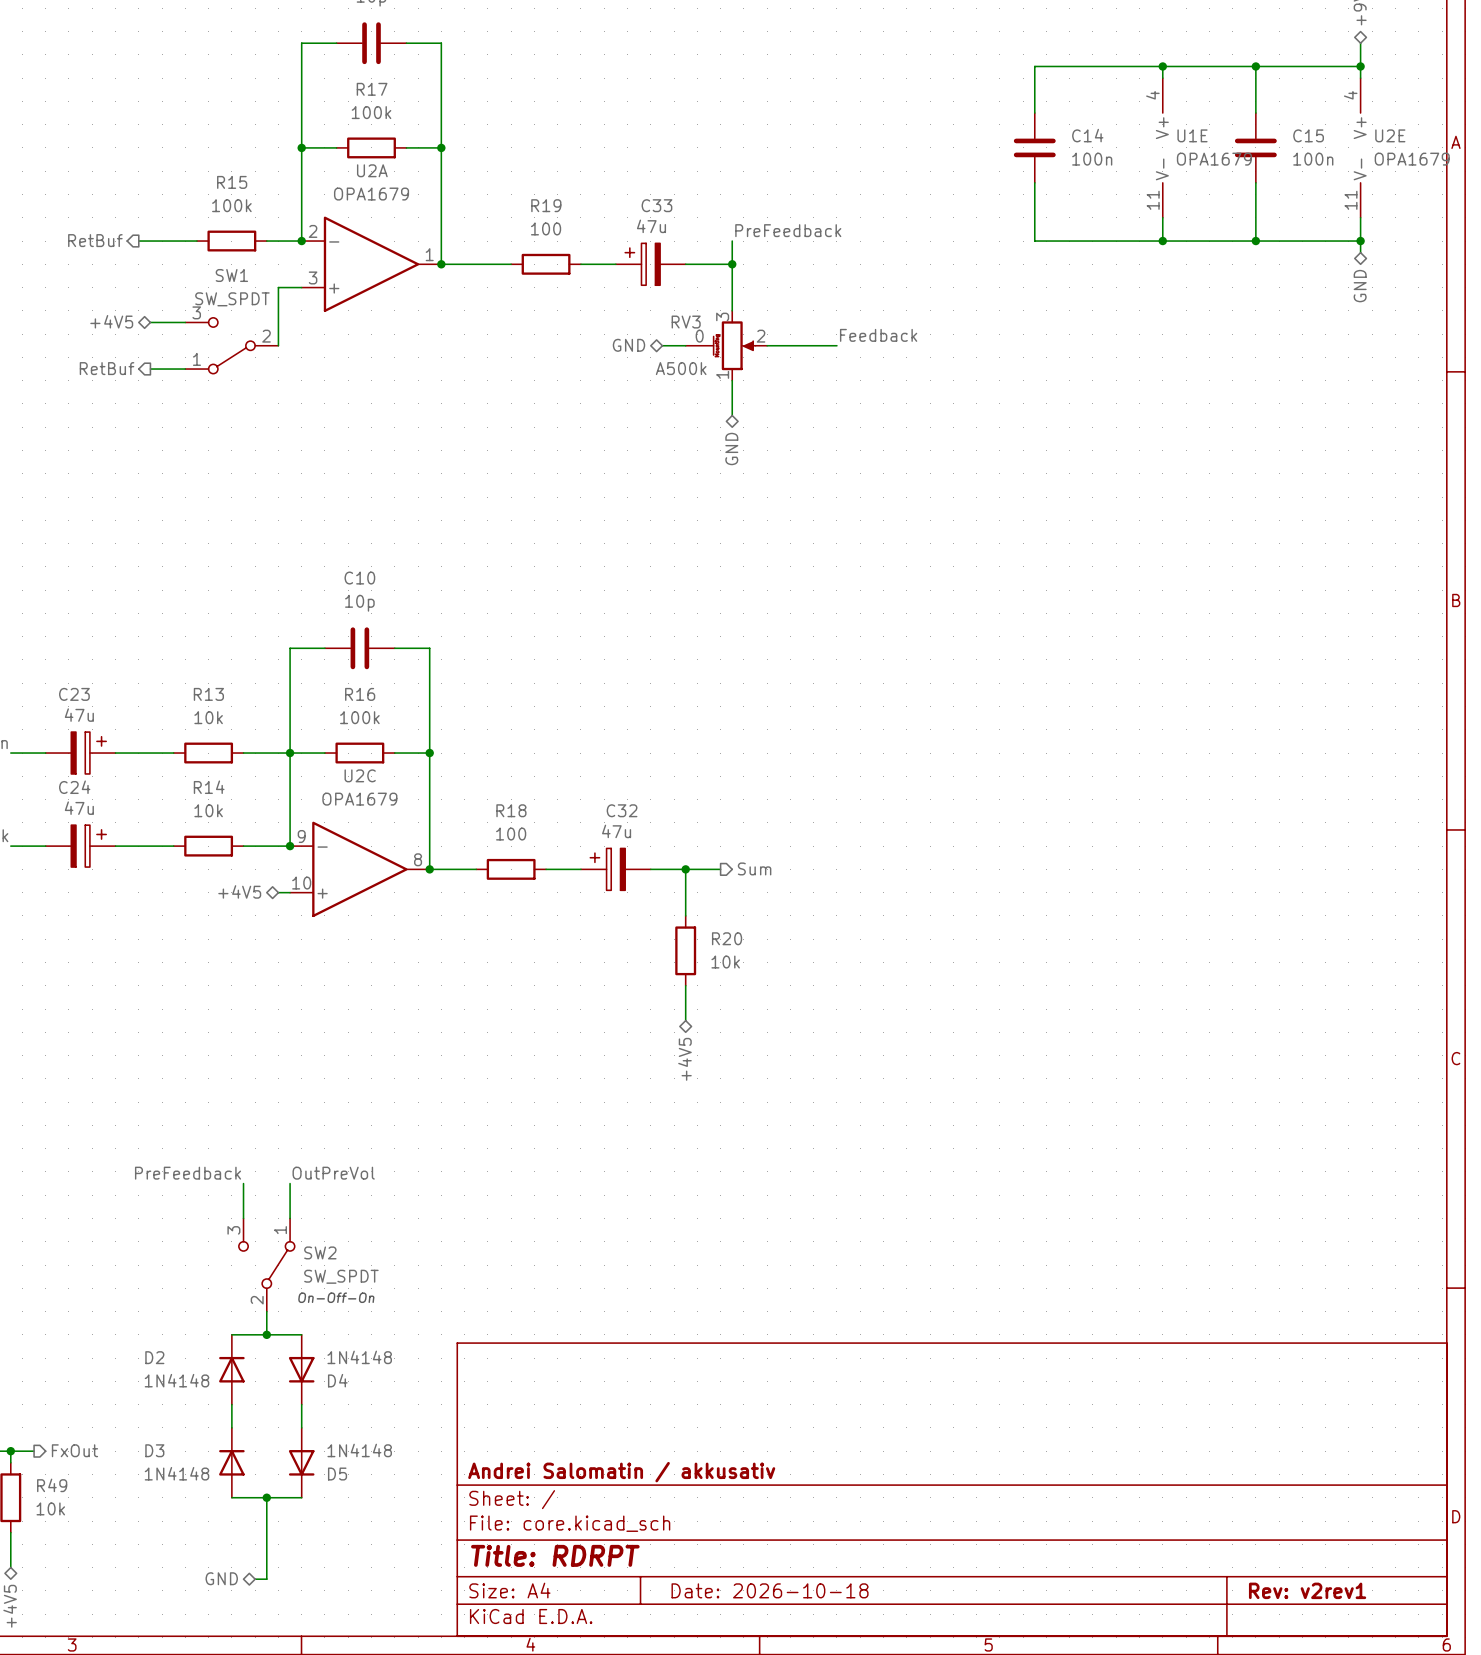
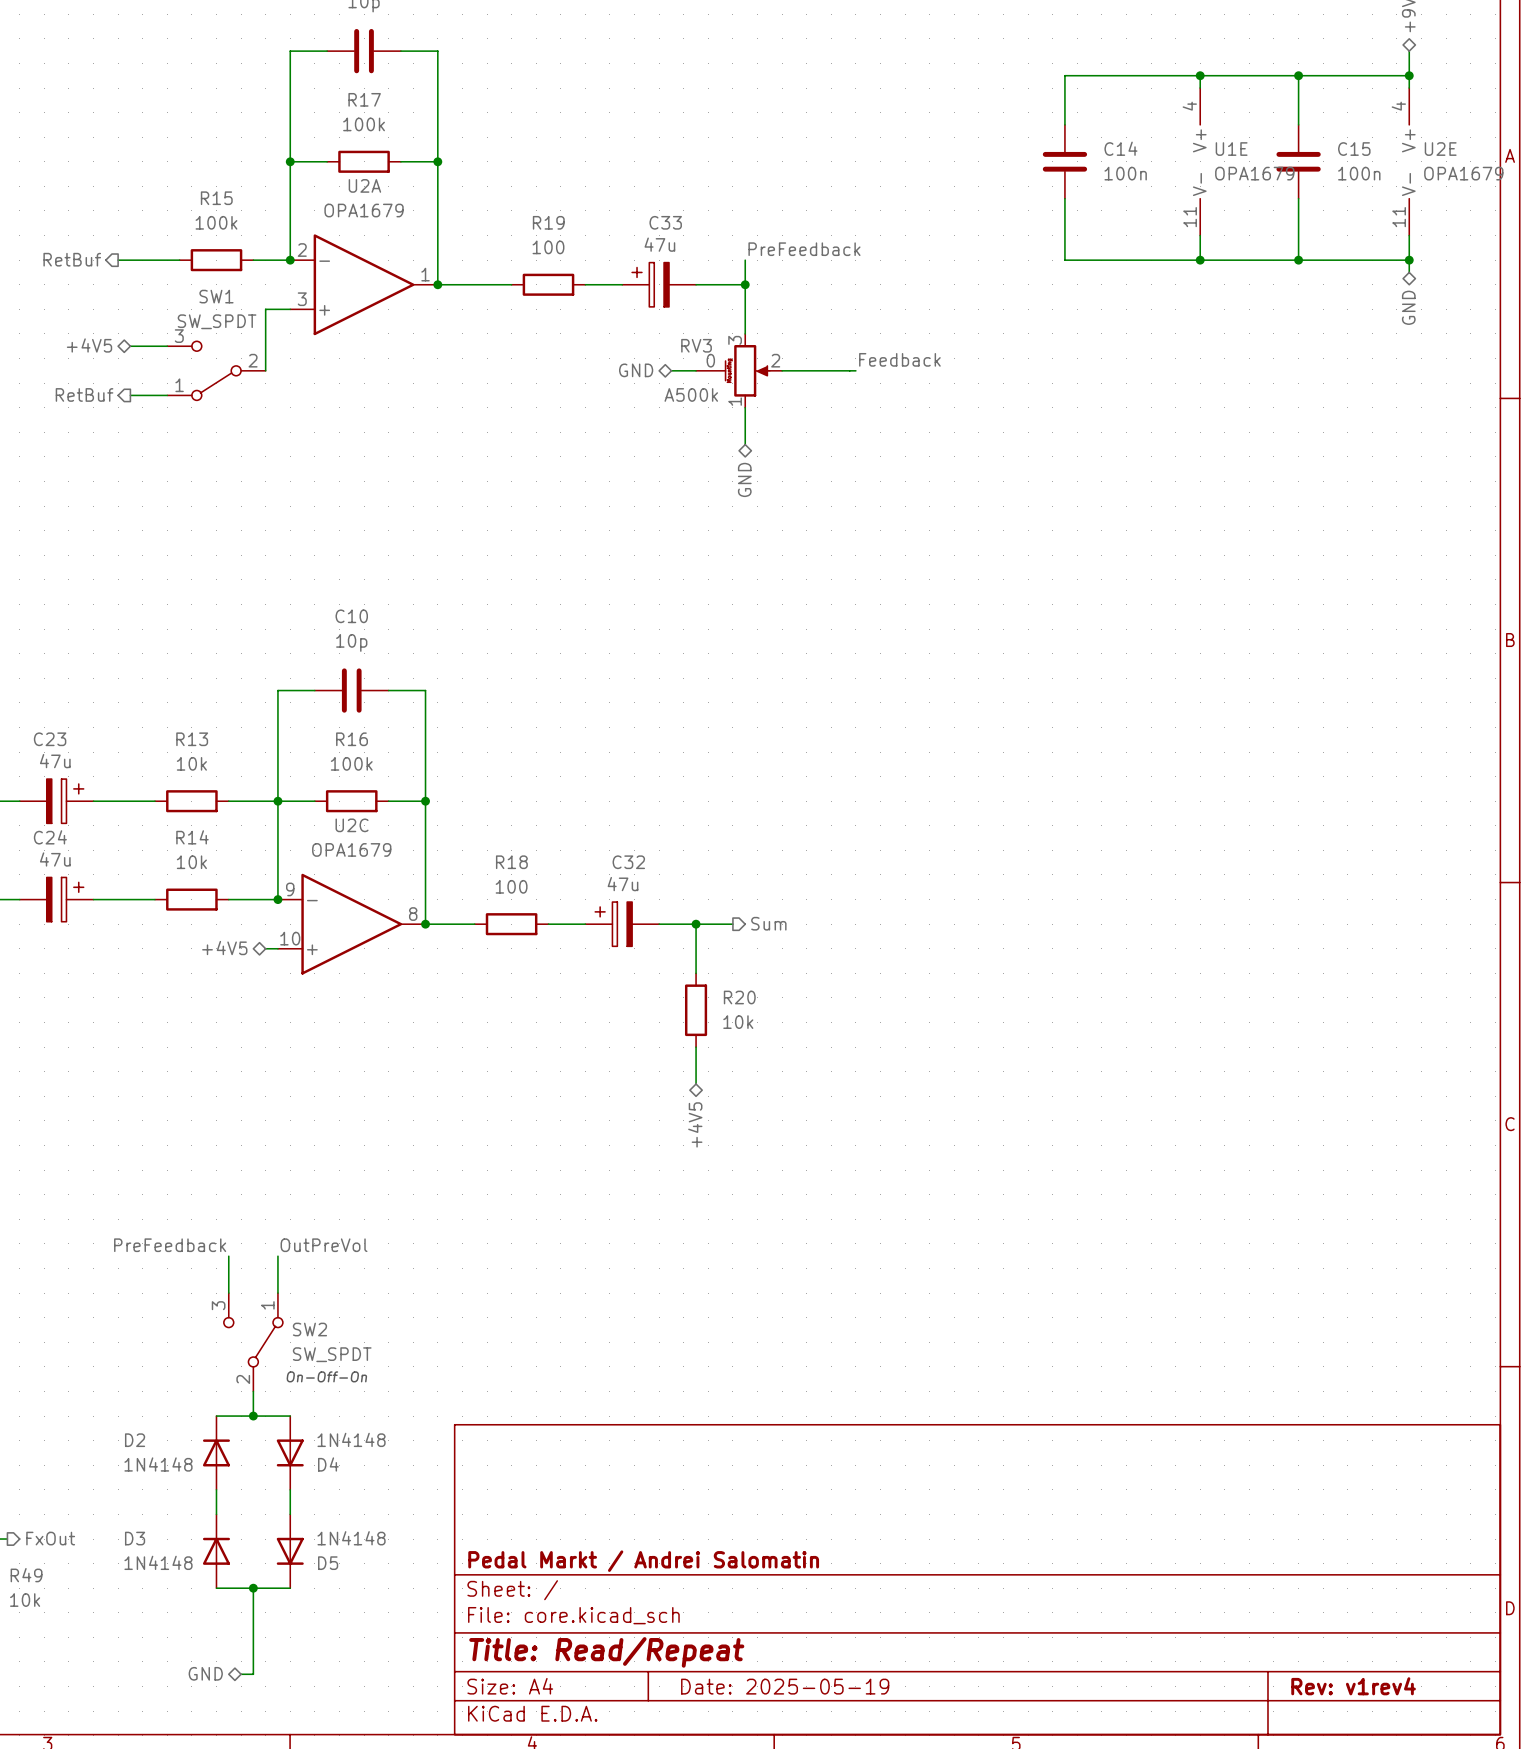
title block: Andrei Salomatin / akkusativ (621, 1472) -> Pedal Markt / Andrei Salomatin (643, 1561)
title block: Title: RDRPT (555, 1555) -> Title: Read/Repeat (606, 1652)
title block: Date: 2026-10-18 (770, 1590) -> Date: 2025-05-19 (785, 1686)
title block: Rev: v2rev1 (1307, 1590) -> Rev: v1rev4 (1353, 1686)

